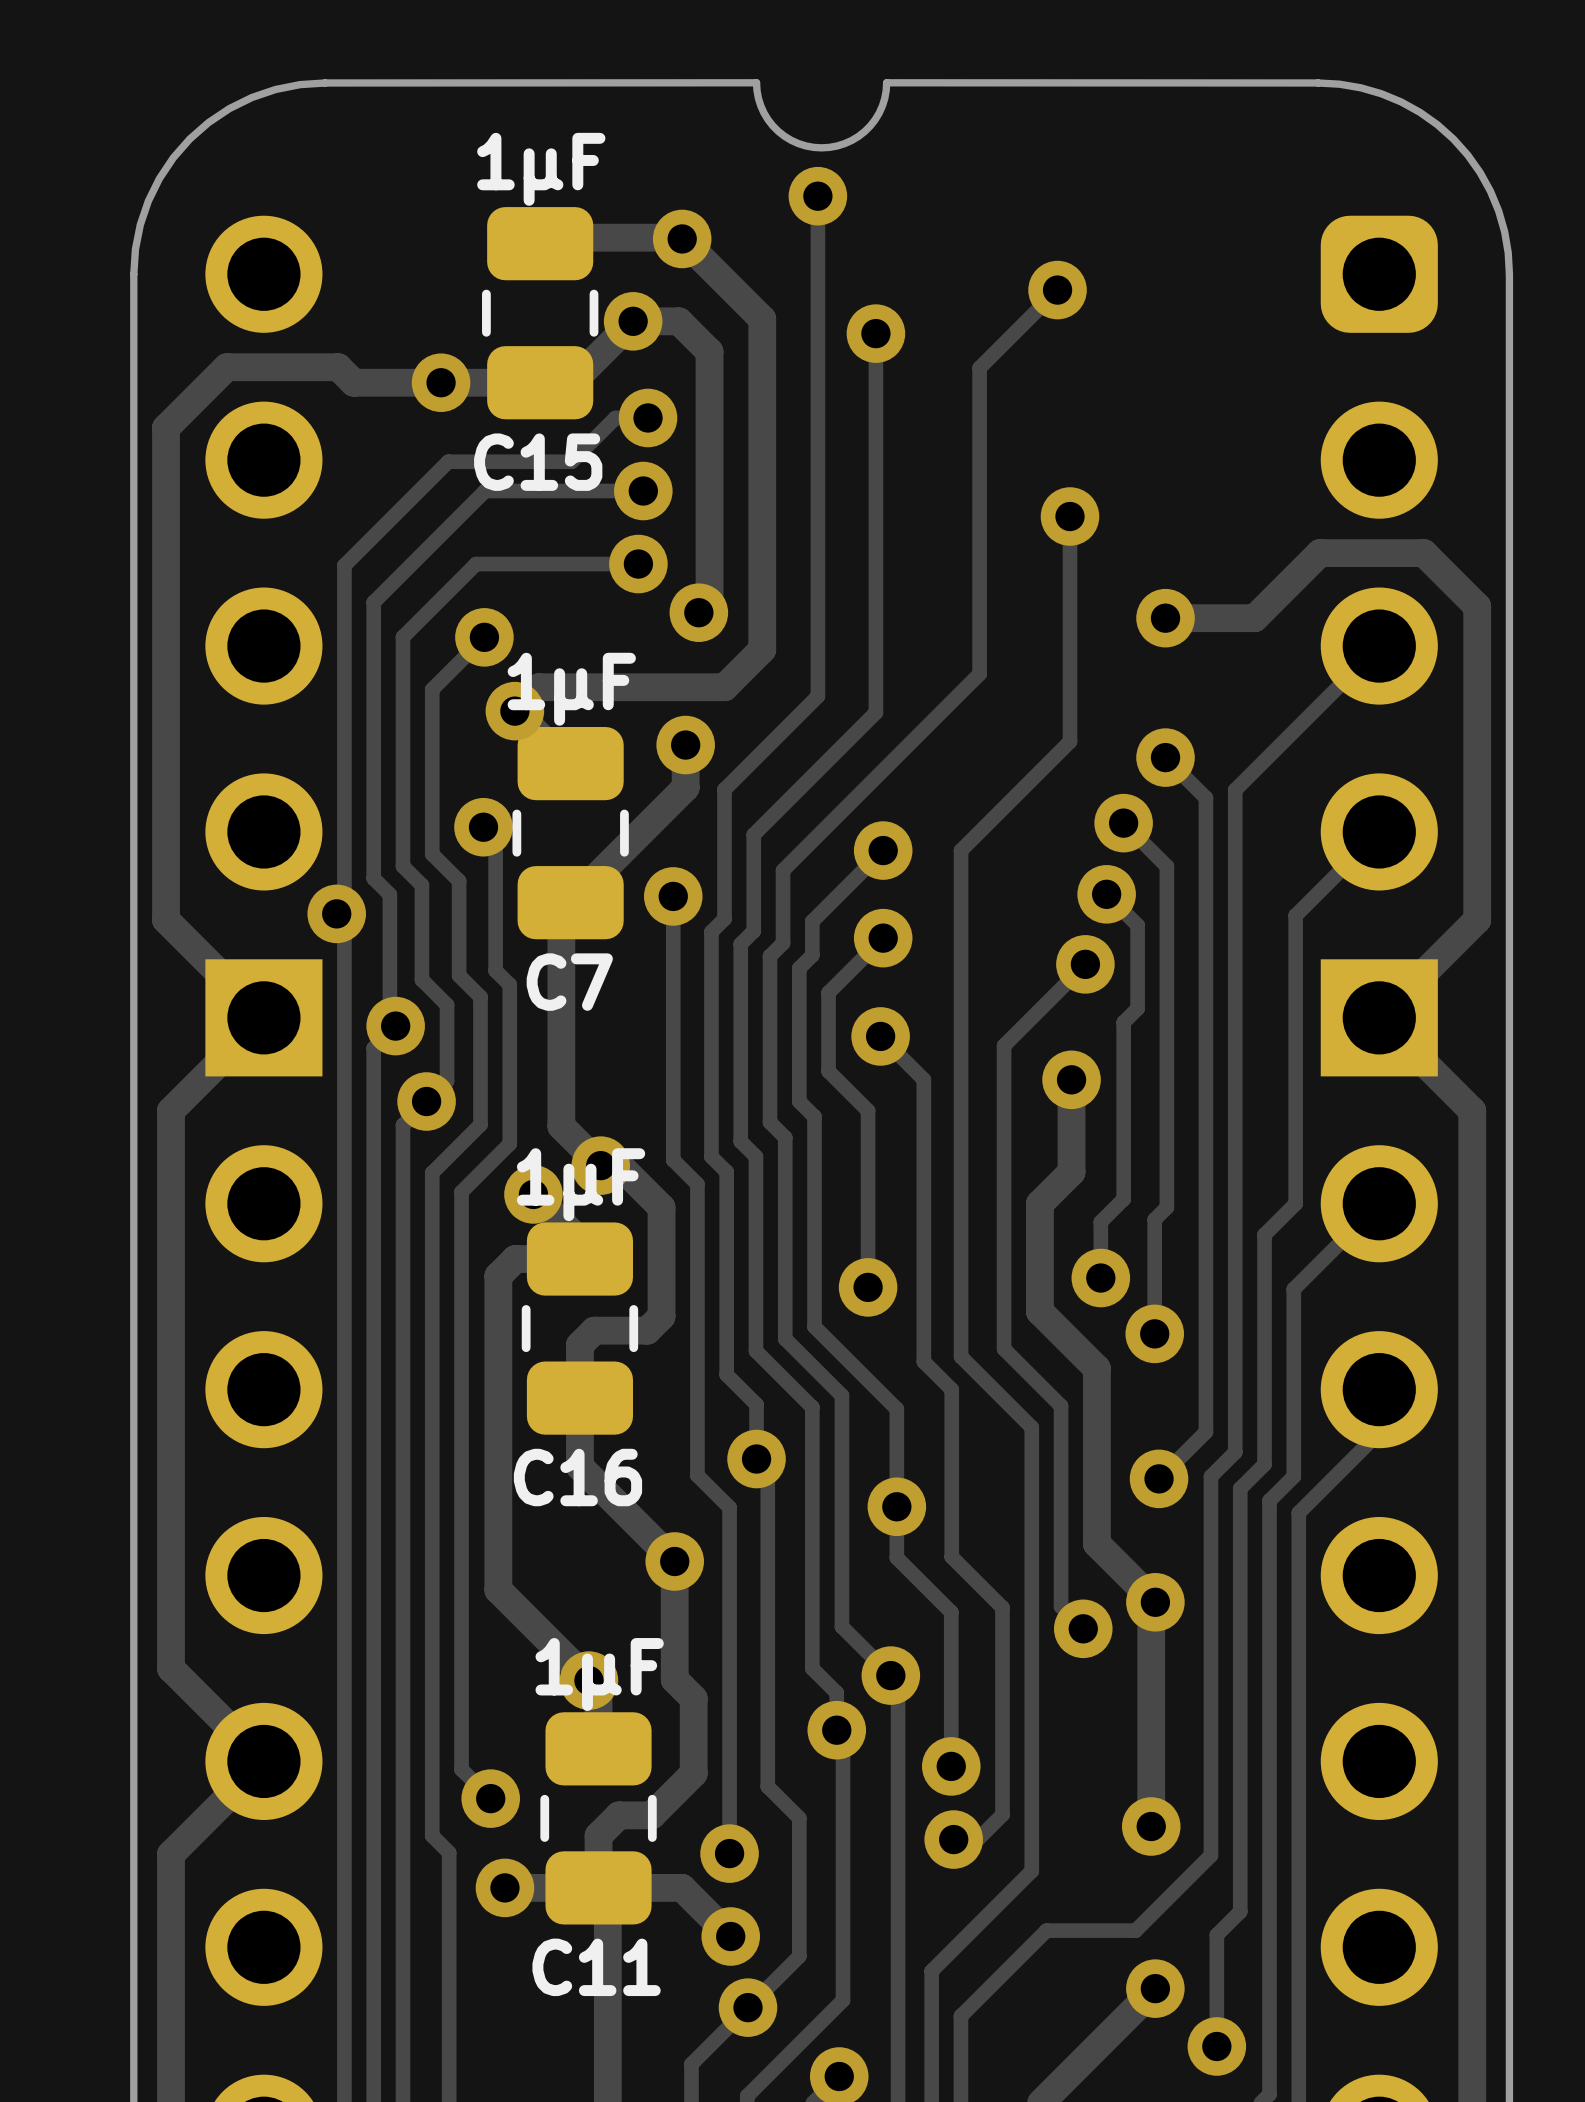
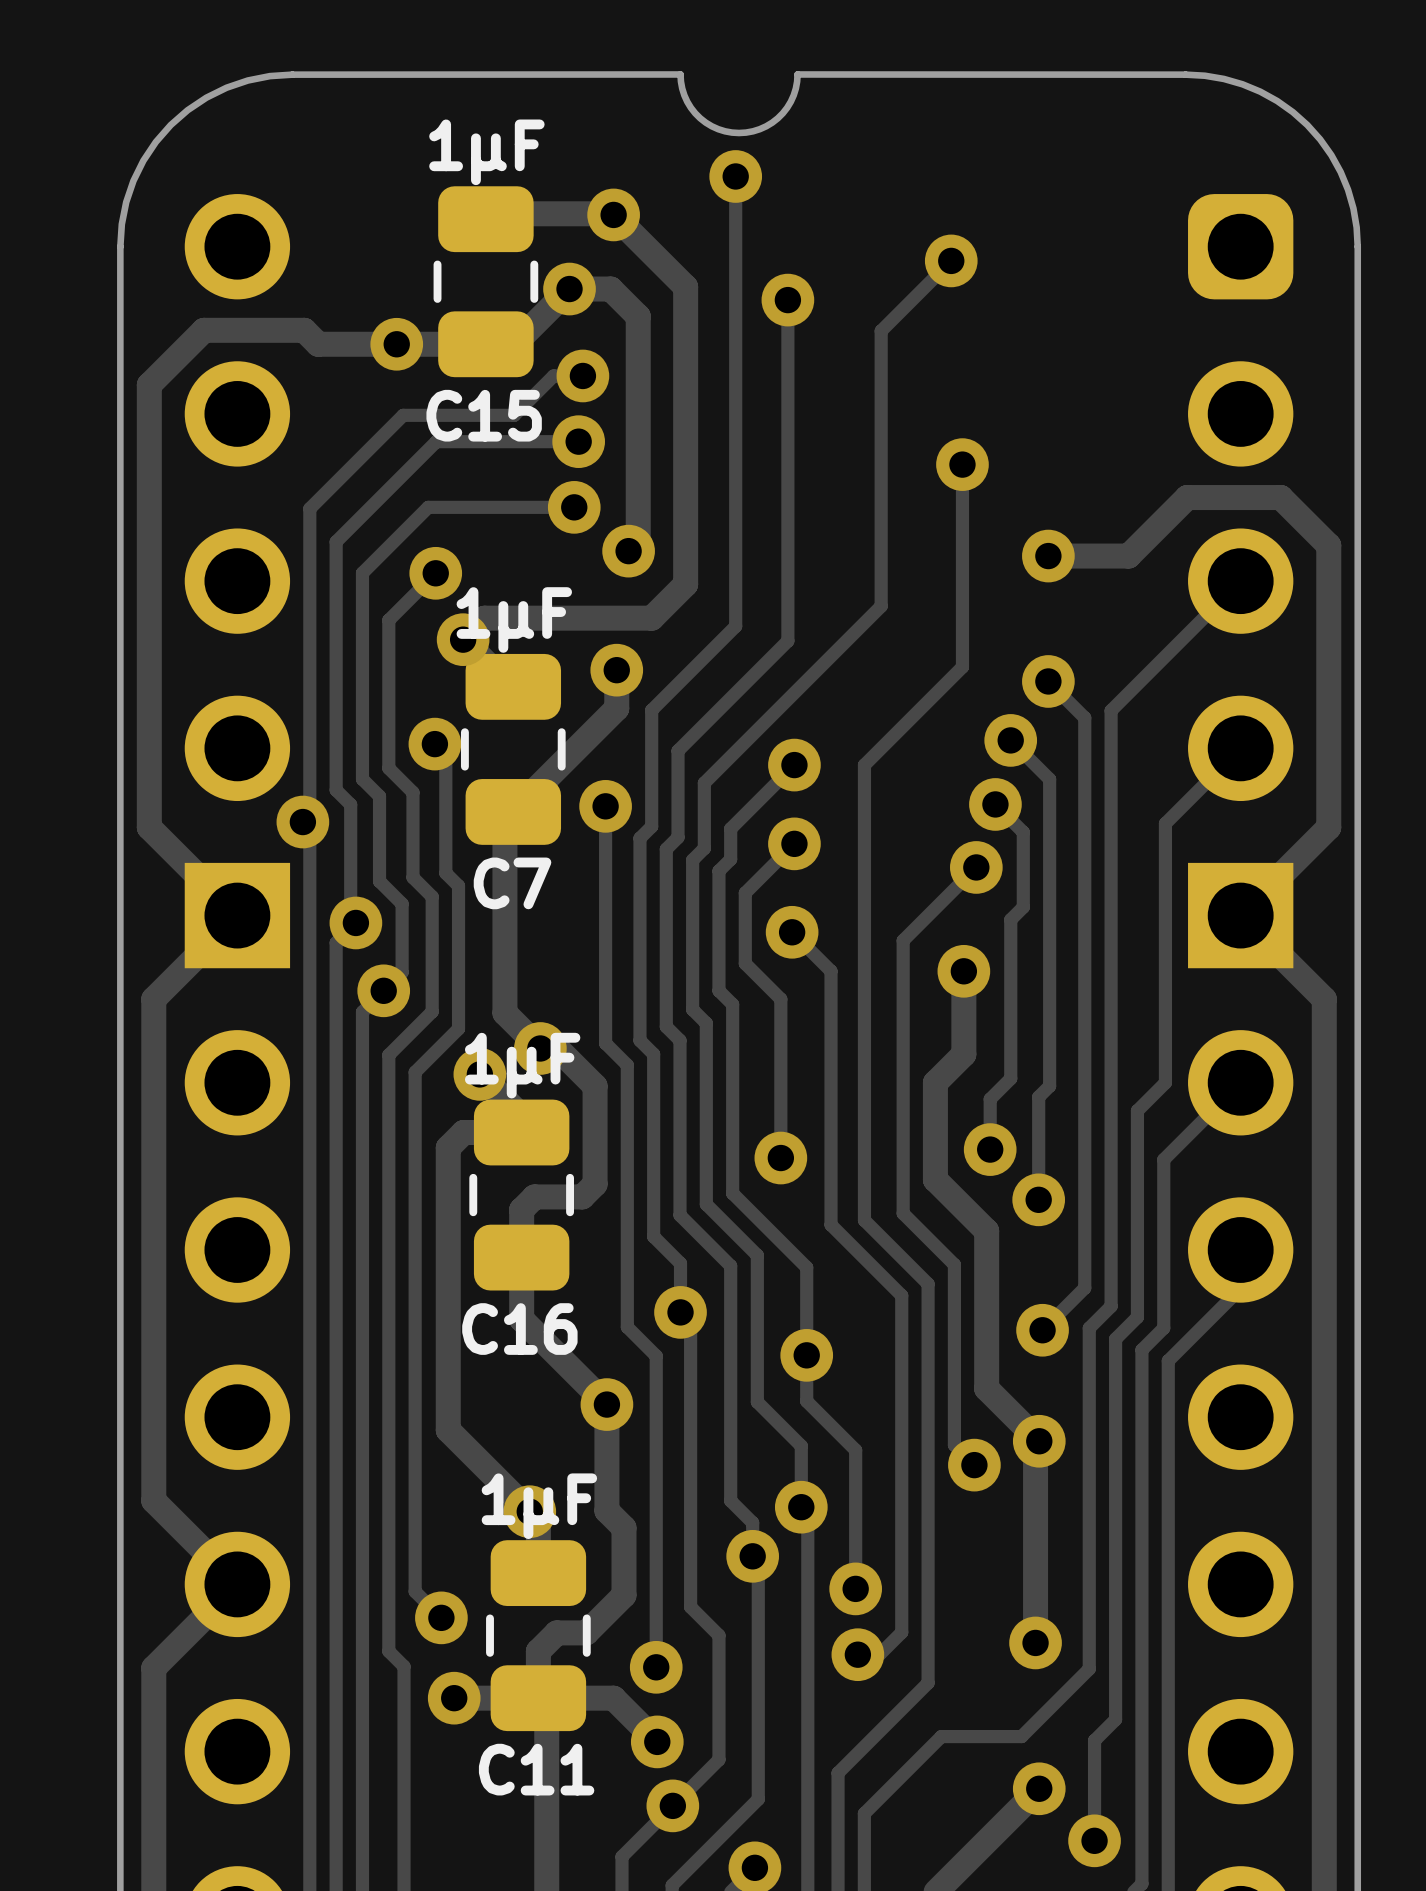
track: (951, 1389) (951, 1556) (1002, 1607) -> (856, 1249) (901, 1295) (901, 1446)
track: (841, 1558) (841, 1626) (890, 1675) -> (757, 1402) (801, 1446) (801, 1507)

